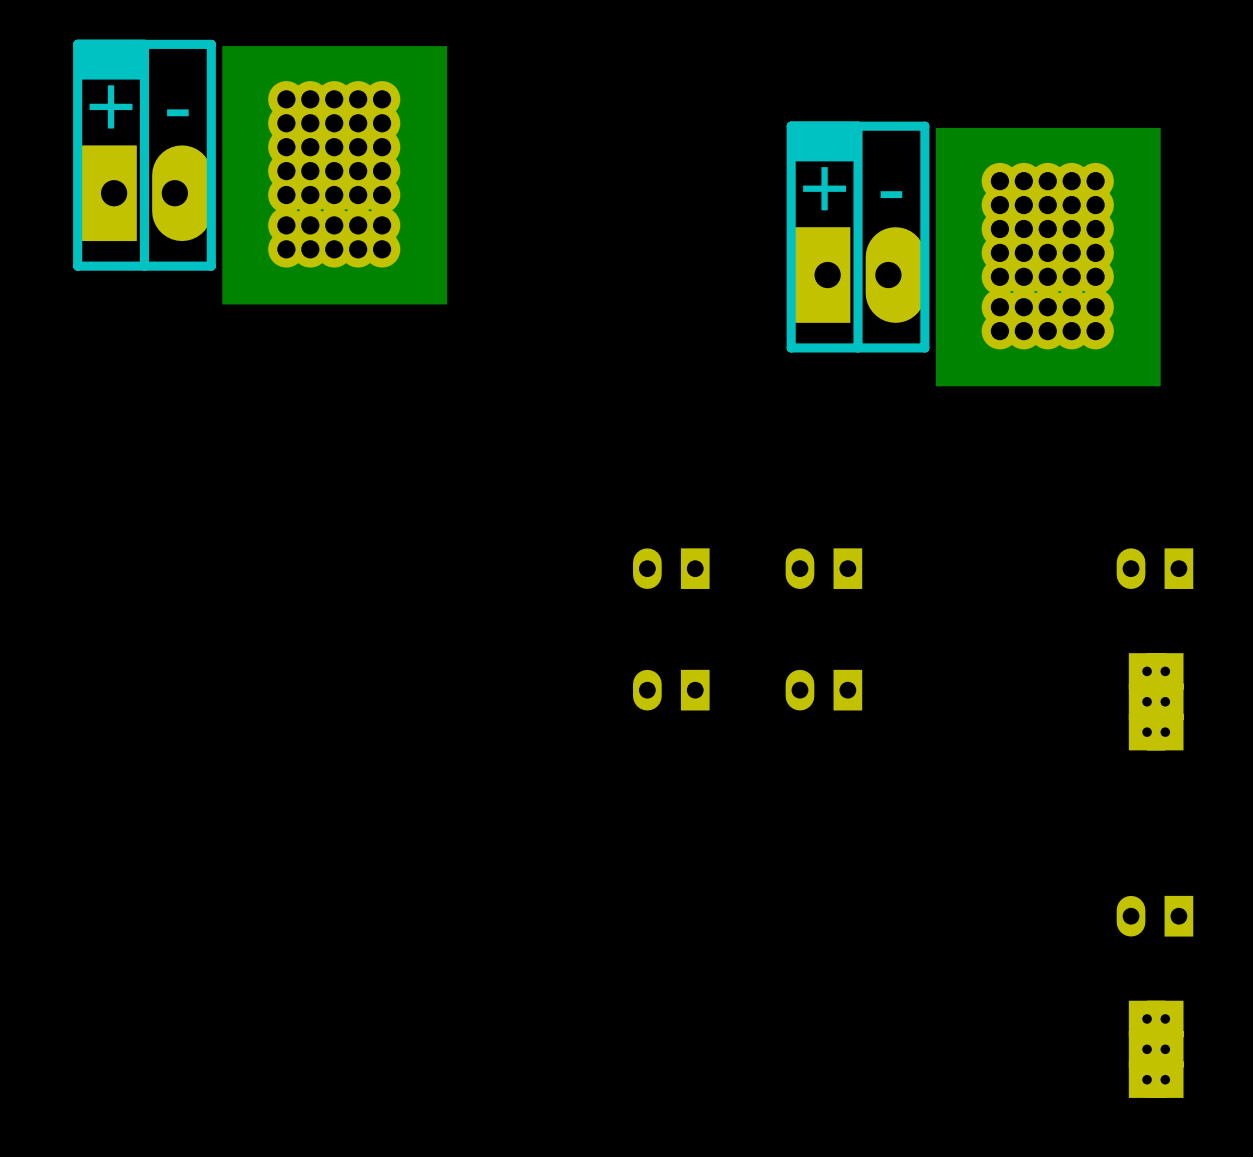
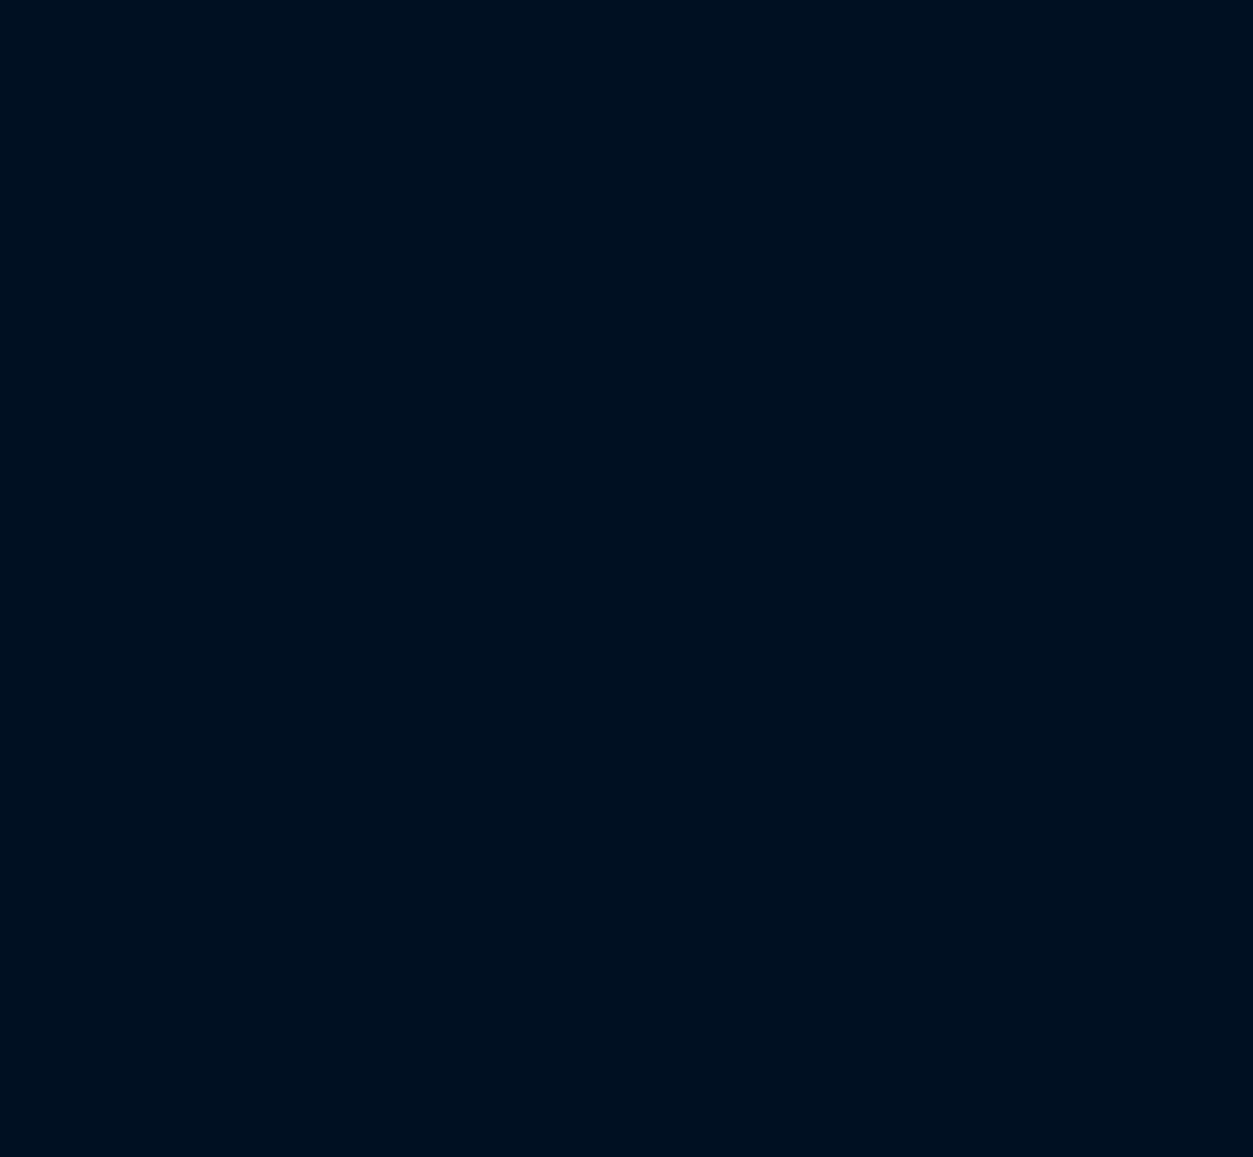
part: (144, 155) -> none
part: (334, 175) -> none
part: (858, 236) -> none
part: (1048, 257) -> none
part: (671, 568) -> none
part: (823, 568) -> none
part: (1154, 568) -> none
part: (671, 690) -> none
part: (823, 690) -> none
part: (1156, 701) -> none
part: (1154, 916) -> none
part: (1156, 1049) -> none

